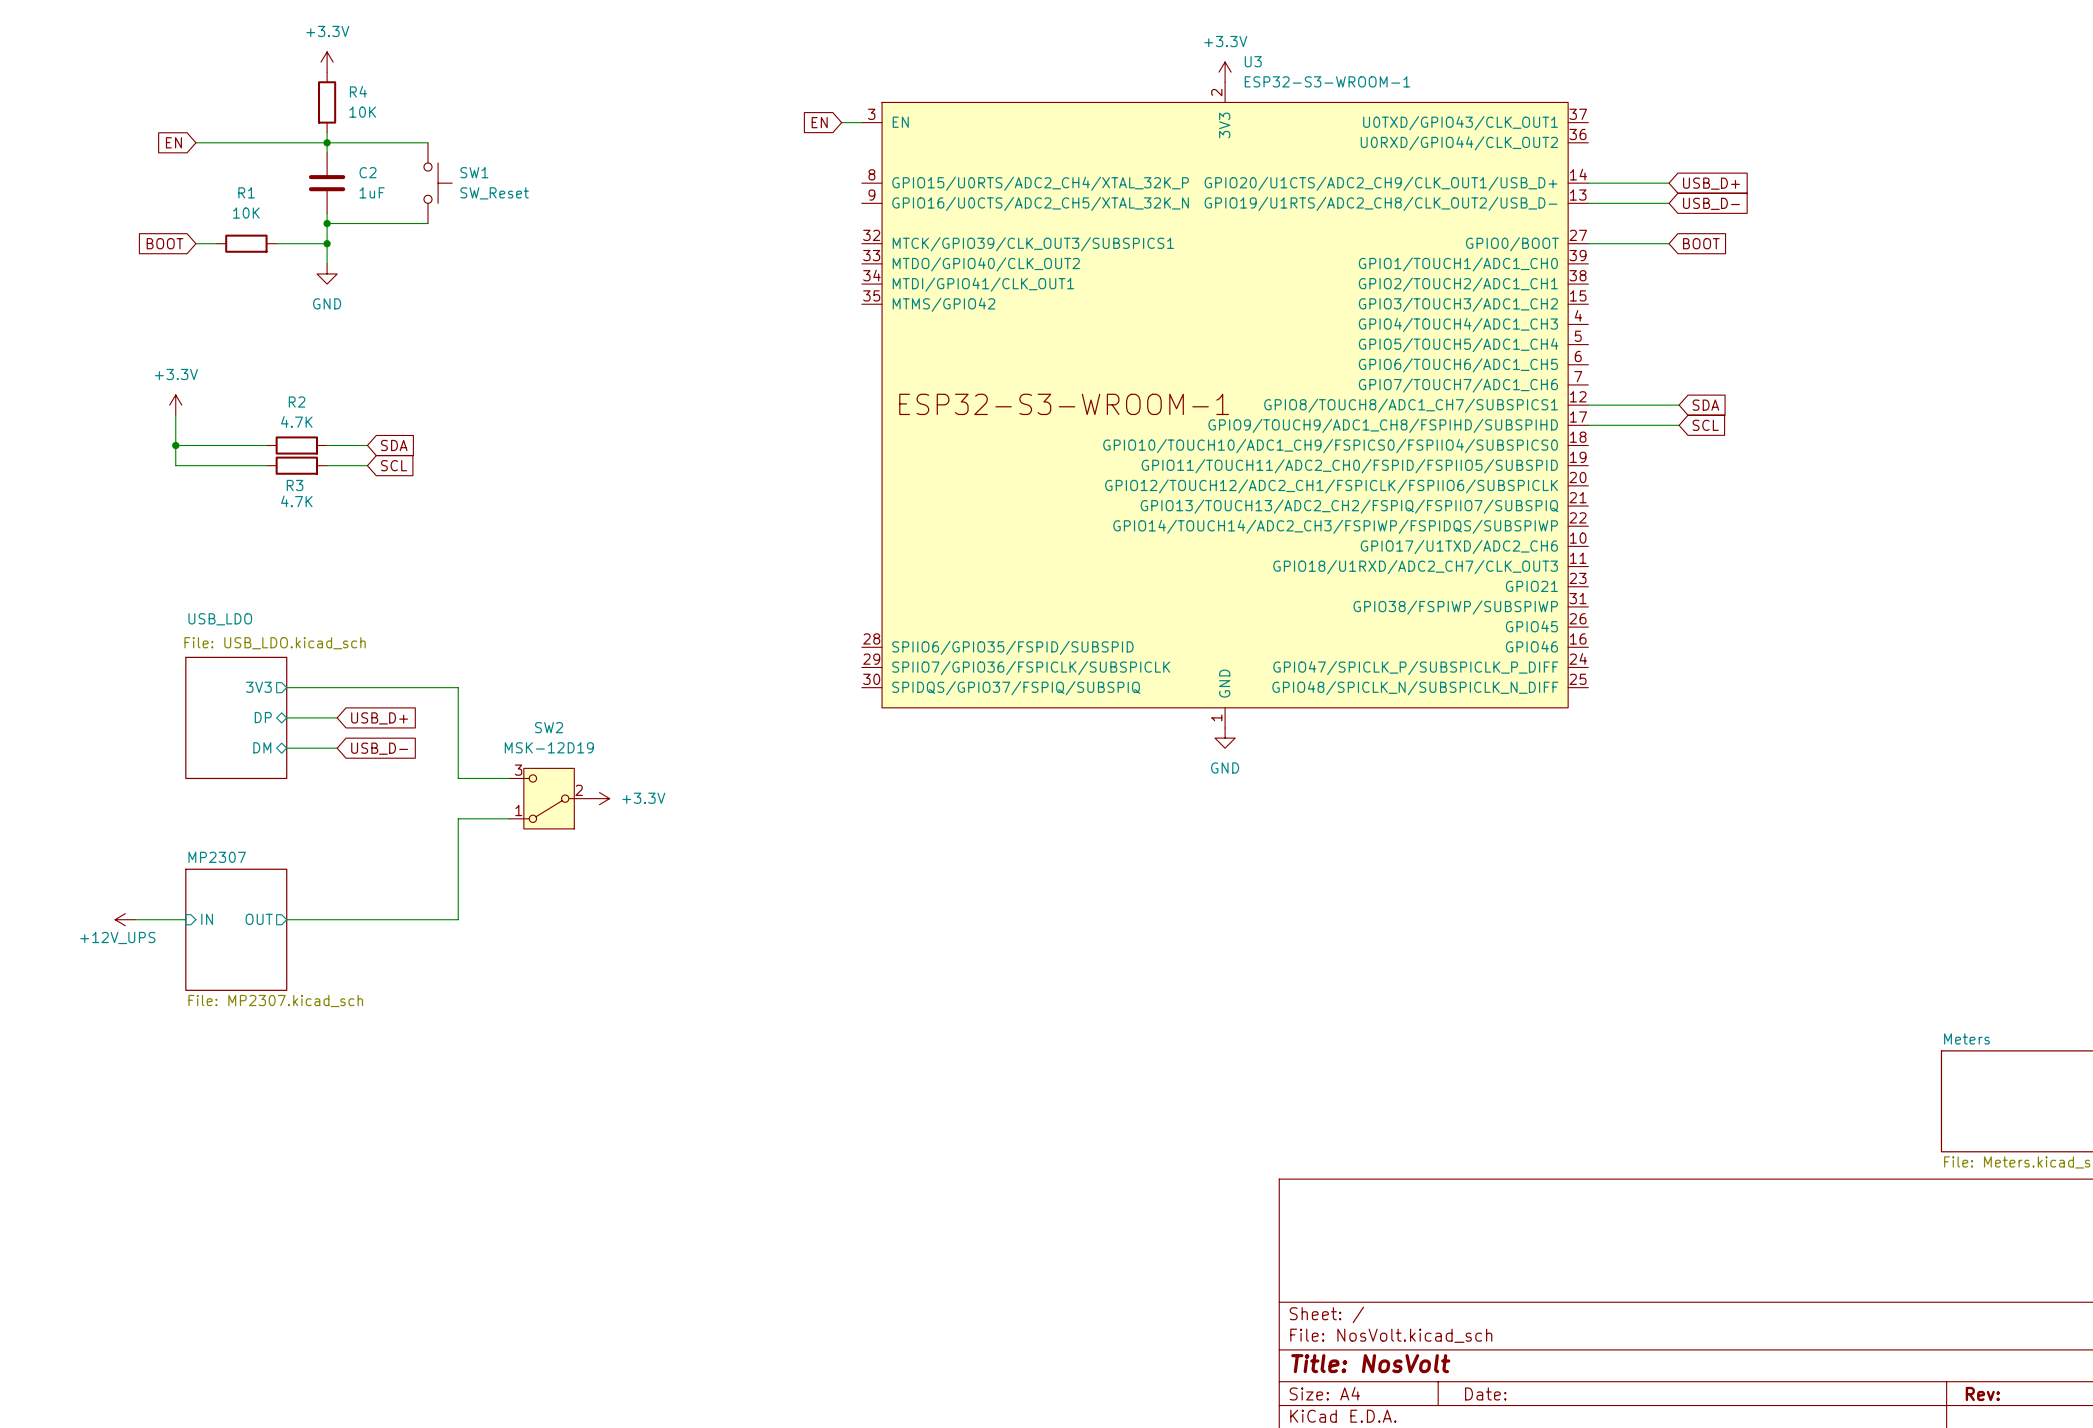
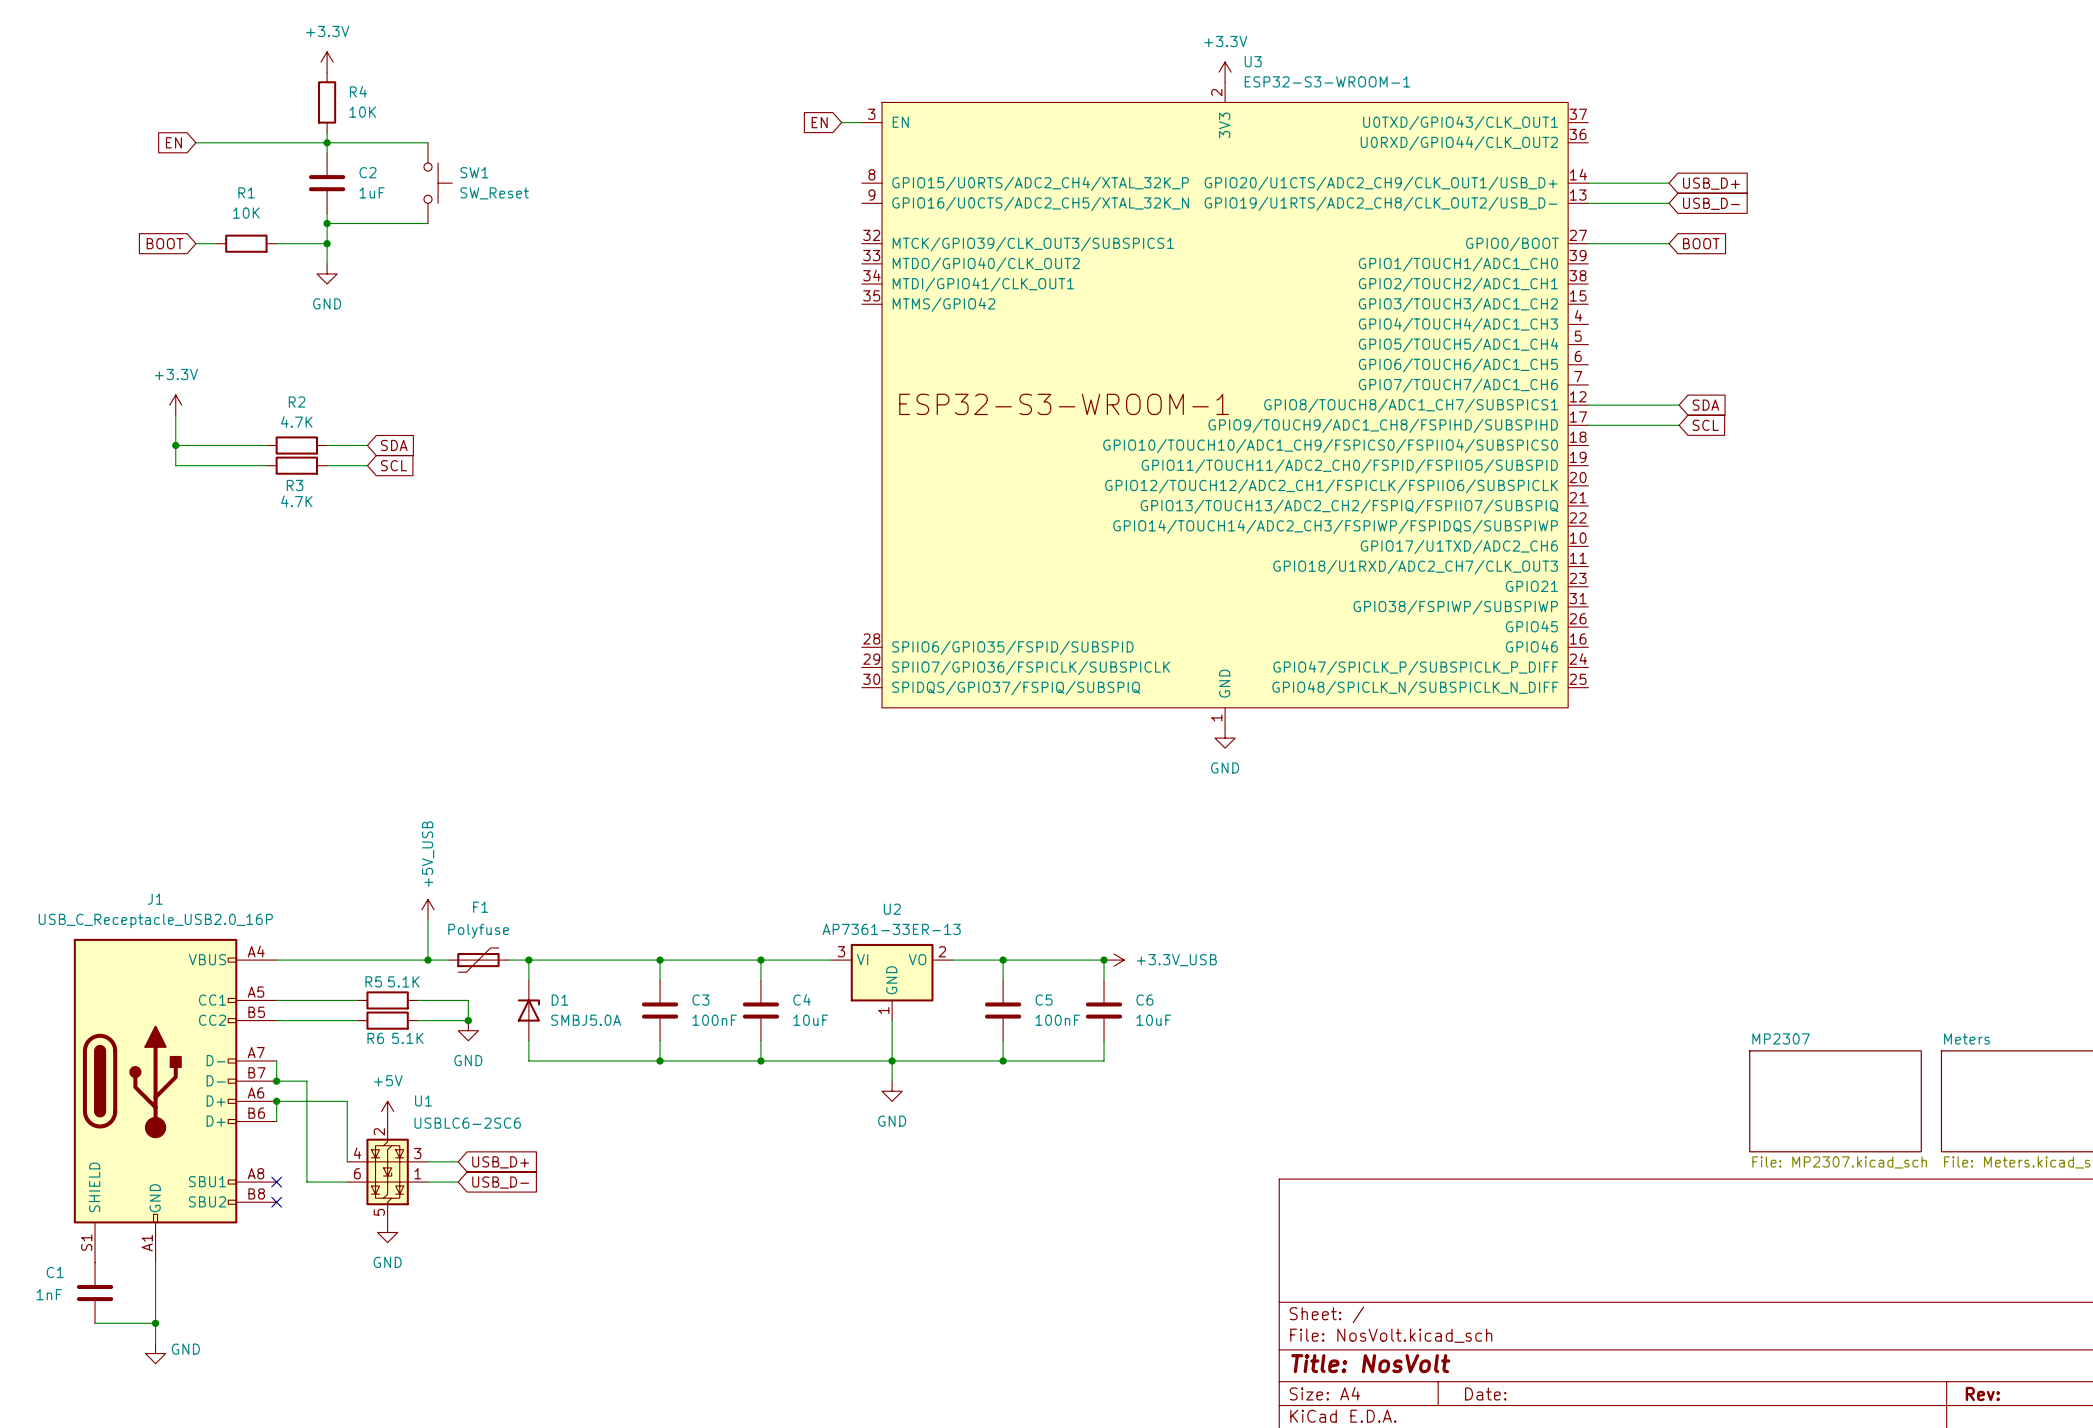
sheet pin: 3V3 (258, 687) -> none
wire: (286, 687) (458, 687) (458, 778) (508, 778) -> none
sheet USB_LDO: File: USB_LDO.kicad_sch (236, 717) -> none
sheet pin: DP (263, 717) -> none
wire: (286, 717) (337, 717) -> none
global label: USB_D+ (379, 718) -> none
sheet pin: DM (262, 747) -> none
wire: (286, 748) (337, 748) -> none
global label: USB_D- (379, 748) -> none
SW2: MSK-12D19 (549, 798) -> none
power symbol: +3.3V (599, 798) -> none
wire: (508, 818) (458, 818) (458, 919) (286, 919) -> none
sheet MP2307 name position: MP2307 (217, 857) -> MP2307 (1781, 1038)
sheet MP2307 shape: [185, 868, 288, 991] -> [1749, 1050, 1922, 1153]
power symbol: none -> +5V_USB (427, 909)
power symbol: +12V_UPS (125, 919) -> none
wire: (135, 919) (185, 919) -> none
sheet pin: IN (207, 919) -> none
sheet pin: OUT (259, 919) -> none
wire: none -> (427, 919) (427, 960)
wire: none -> (276, 960) (448, 960)
junction: none -> (427, 960)
F1: none -> Polyfuse (478, 960)
wire: none -> (508, 960) (831, 960)
wire: none -> (528, 960) (528, 980)
junction: none -> (528, 960)
wire: none -> (660, 960) (660, 980)
junction: none -> (660, 960)
wire: none -> (760, 960) (760, 980)
junction: none -> (760, 960)
wire: none -> (952, 960) (1104, 960) (1104, 980)
wire: none -> (1003, 960) (1003, 980)
junction: none -> (1003, 960)
junction: none -> (1104, 960)
power symbol: none -> +3.3V_USB (1114, 960)
U2: none -> AP7361-33ER-13 (892, 982)
sheet MP2307 value position: File: MP2307.kicad_sch (275, 1000) -> File: MP2307.kicad_sch (1839, 1162)
wire: none -> (276, 1000) (357, 1000)
R5: none -> 5.1K (387, 1000)
wire: none -> (417, 1000) (468, 1000) (468, 1020) (417, 1020)
D1: none -> SMBJ5.0A (528, 1010)
C3: none -> 100nF (660, 1010)
C4: none -> 10uF (760, 1010)
C5: none -> 100nF (1003, 1010)
C6: none -> 10uF (1104, 1010)
wire: none -> (276, 1020) (357, 1020)
R6: none -> 5.1K (387, 1020)
junction: none -> (468, 1020)
wire: none -> (892, 1020) (892, 1081)
power symbol: none -> GND (468, 1030)
wire: none -> (528, 1040) (528, 1060) (1104, 1060) (1104, 1040)
wire: none -> (660, 1040) (660, 1060)
wire: none -> (760, 1040) (760, 1060)
wire: none -> (1003, 1040) (1003, 1060)
wire: none -> (276, 1060) (276, 1081) (306, 1081) (306, 1182) (347, 1182)
junction: none -> (660, 1060)
junction: none -> (760, 1060)
junction: none -> (892, 1060)
junction: none -> (1003, 1060)
junction: none -> (276, 1081)
power symbol: none -> GND (892, 1091)
J1: none -> USB_C_Receptacle_USB2.0_16P (175, 1100)
junction: none -> (276, 1101)
power symbol: none -> +5V (387, 1111)
wire: none -> (276, 1121) (276, 1101) (347, 1101) (347, 1161)
wire: none -> (427, 1161) (458, 1161)
global label: none -> USB_D+ (500, 1162)
U1: none -> USBLC6-2SC6 (387, 1171)
no-connect mark: none -> (276, 1182)
wire: none -> (427, 1182) (458, 1182)
global label: none -> USB_D- (500, 1182)
no-connect mark: none -> (276, 1202)
power symbol: none -> GND (387, 1232)
wire: none -> (155, 1262) (155, 1343)
C1: none -> 1nF (95, 1293)
wire: none -> (95, 1323) (155, 1323)
junction: none -> (155, 1323)
power symbol: none -> GND (155, 1353)

